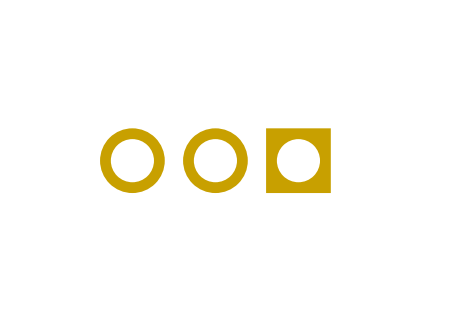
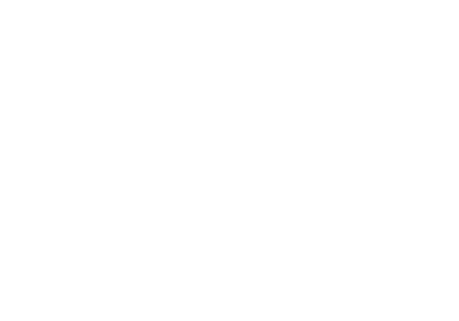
part: (215, 160) -> none

